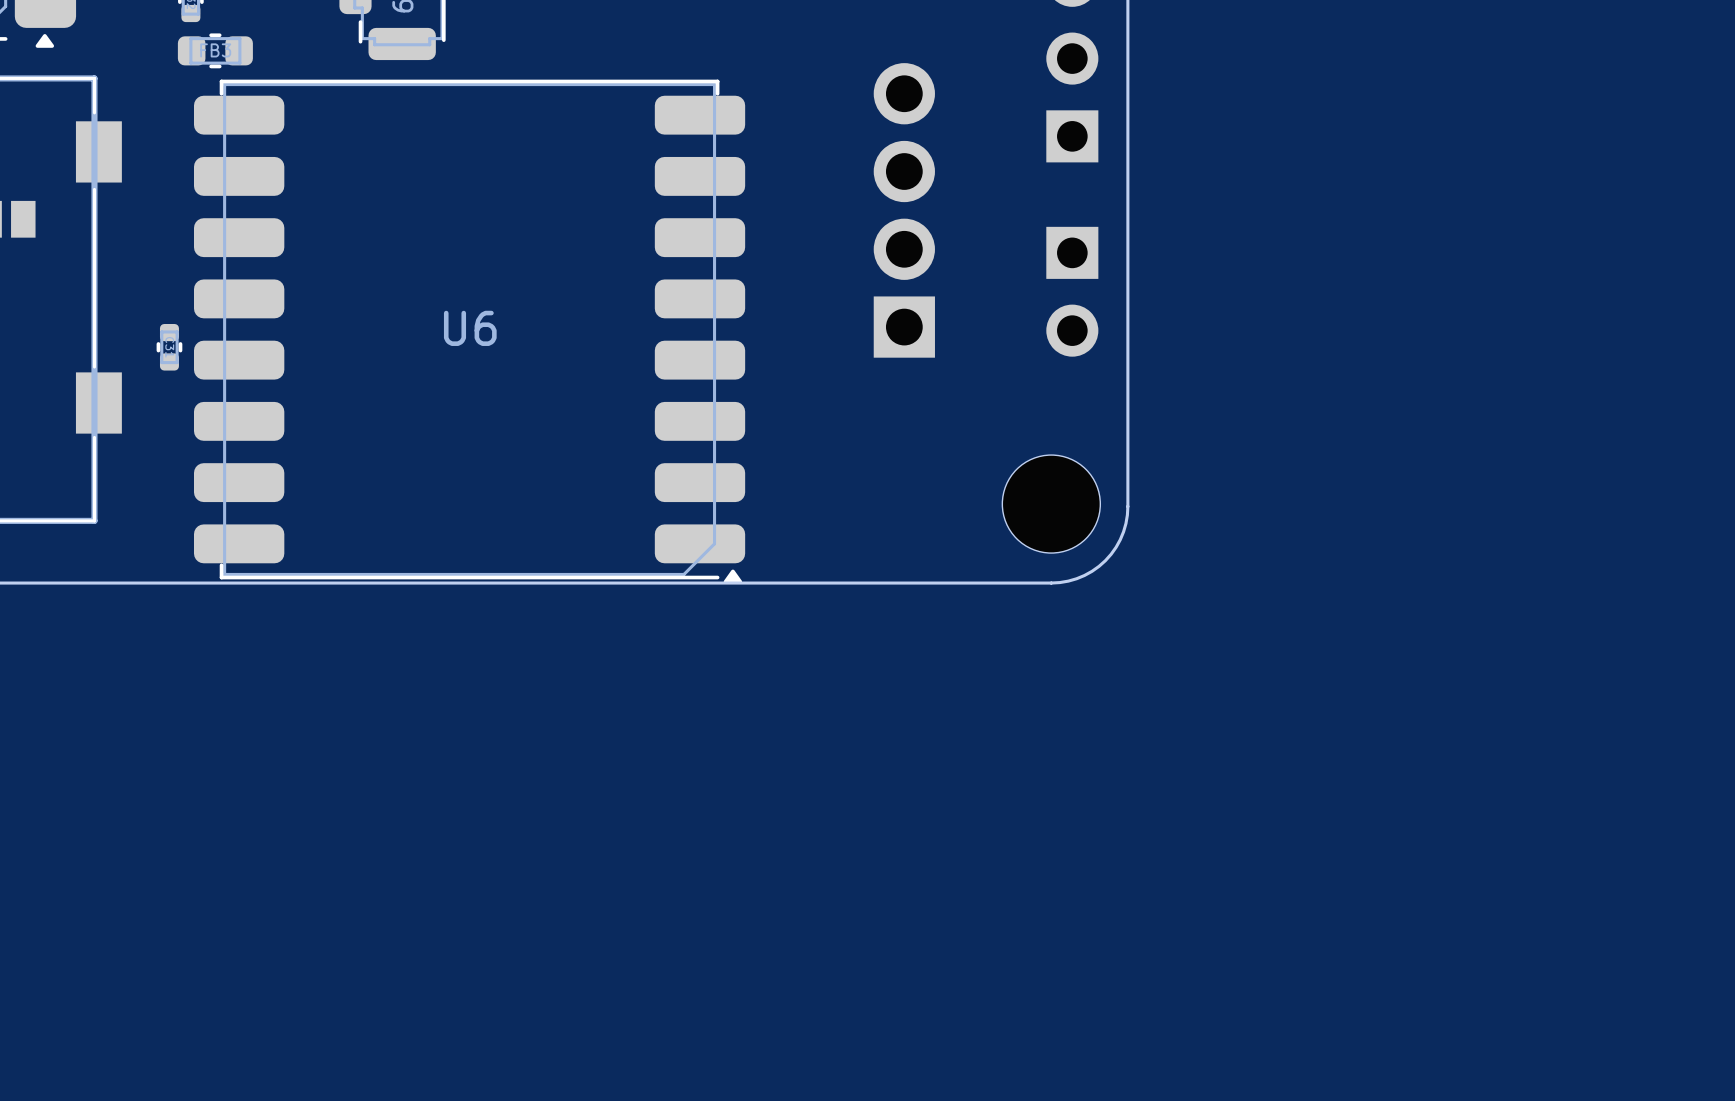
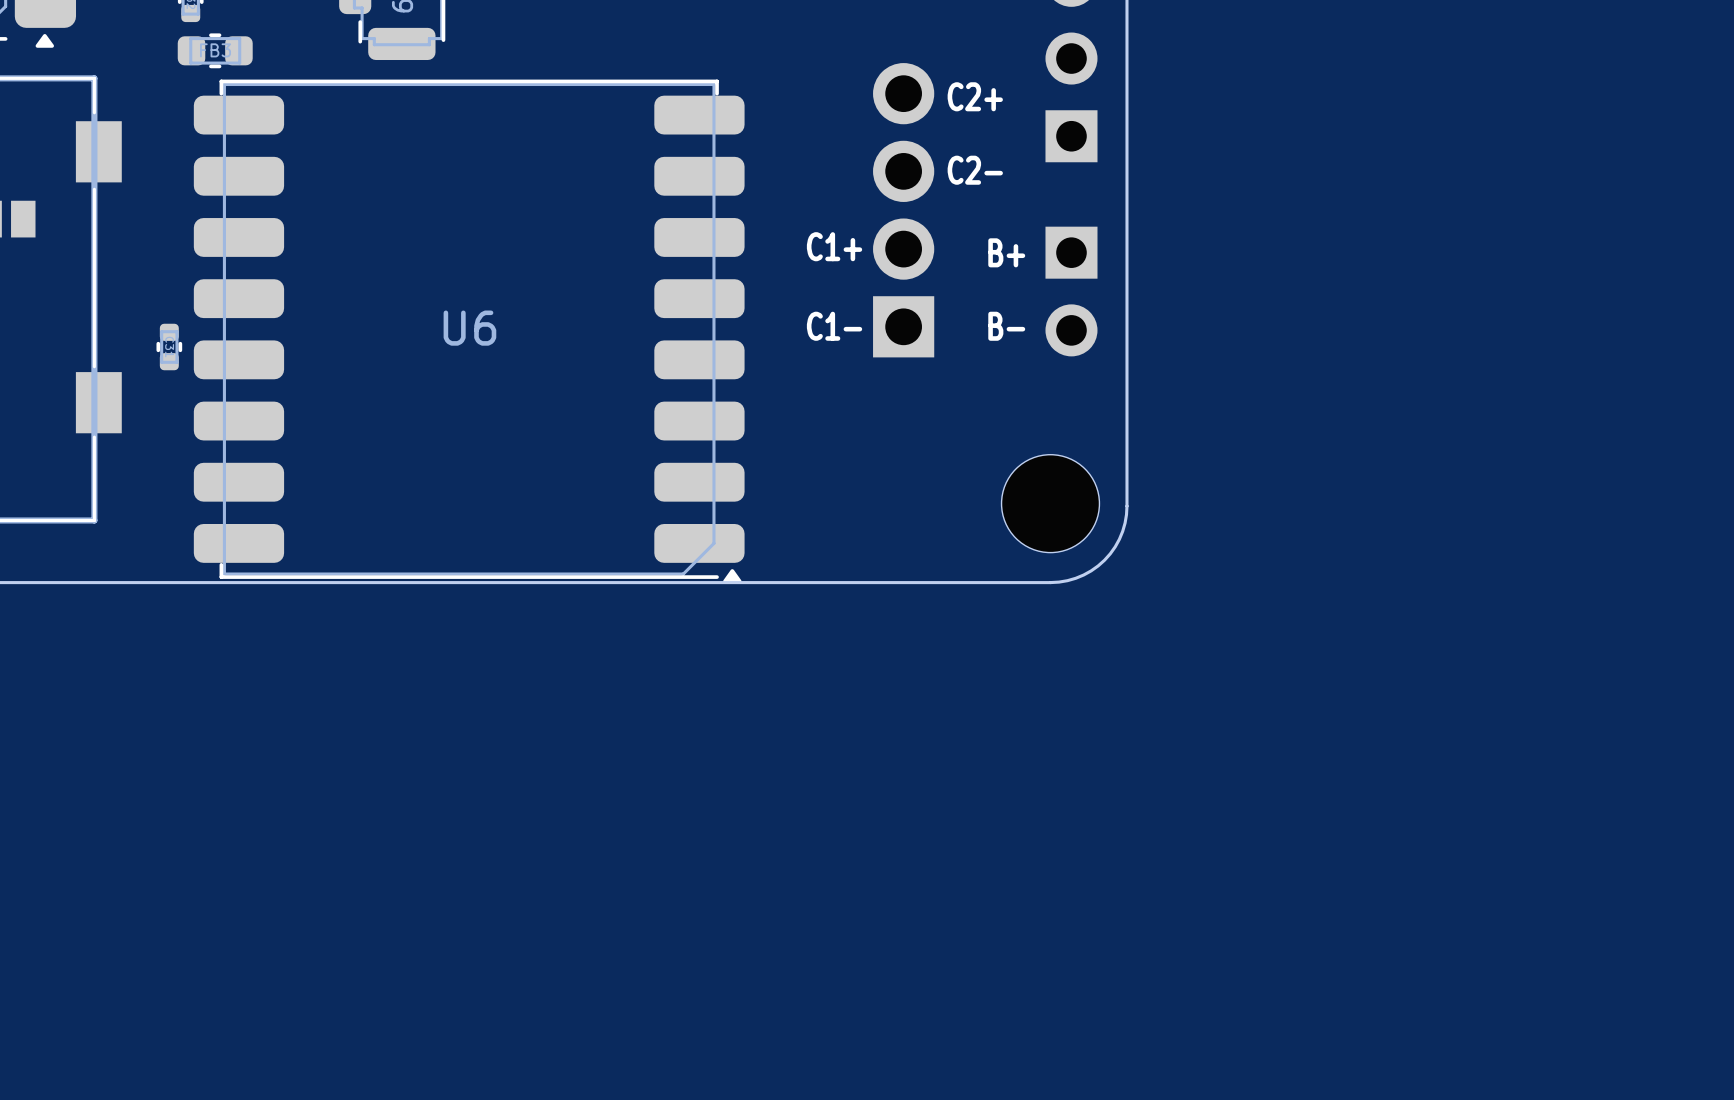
text: none -> C2+ (975, 96)
text: none -> C2- (975, 170)
text: none -> C1+ (834, 246)
text: none -> B+ (1006, 252)
text: none -> C1- (834, 326)
text: none -> B- (1006, 326)

